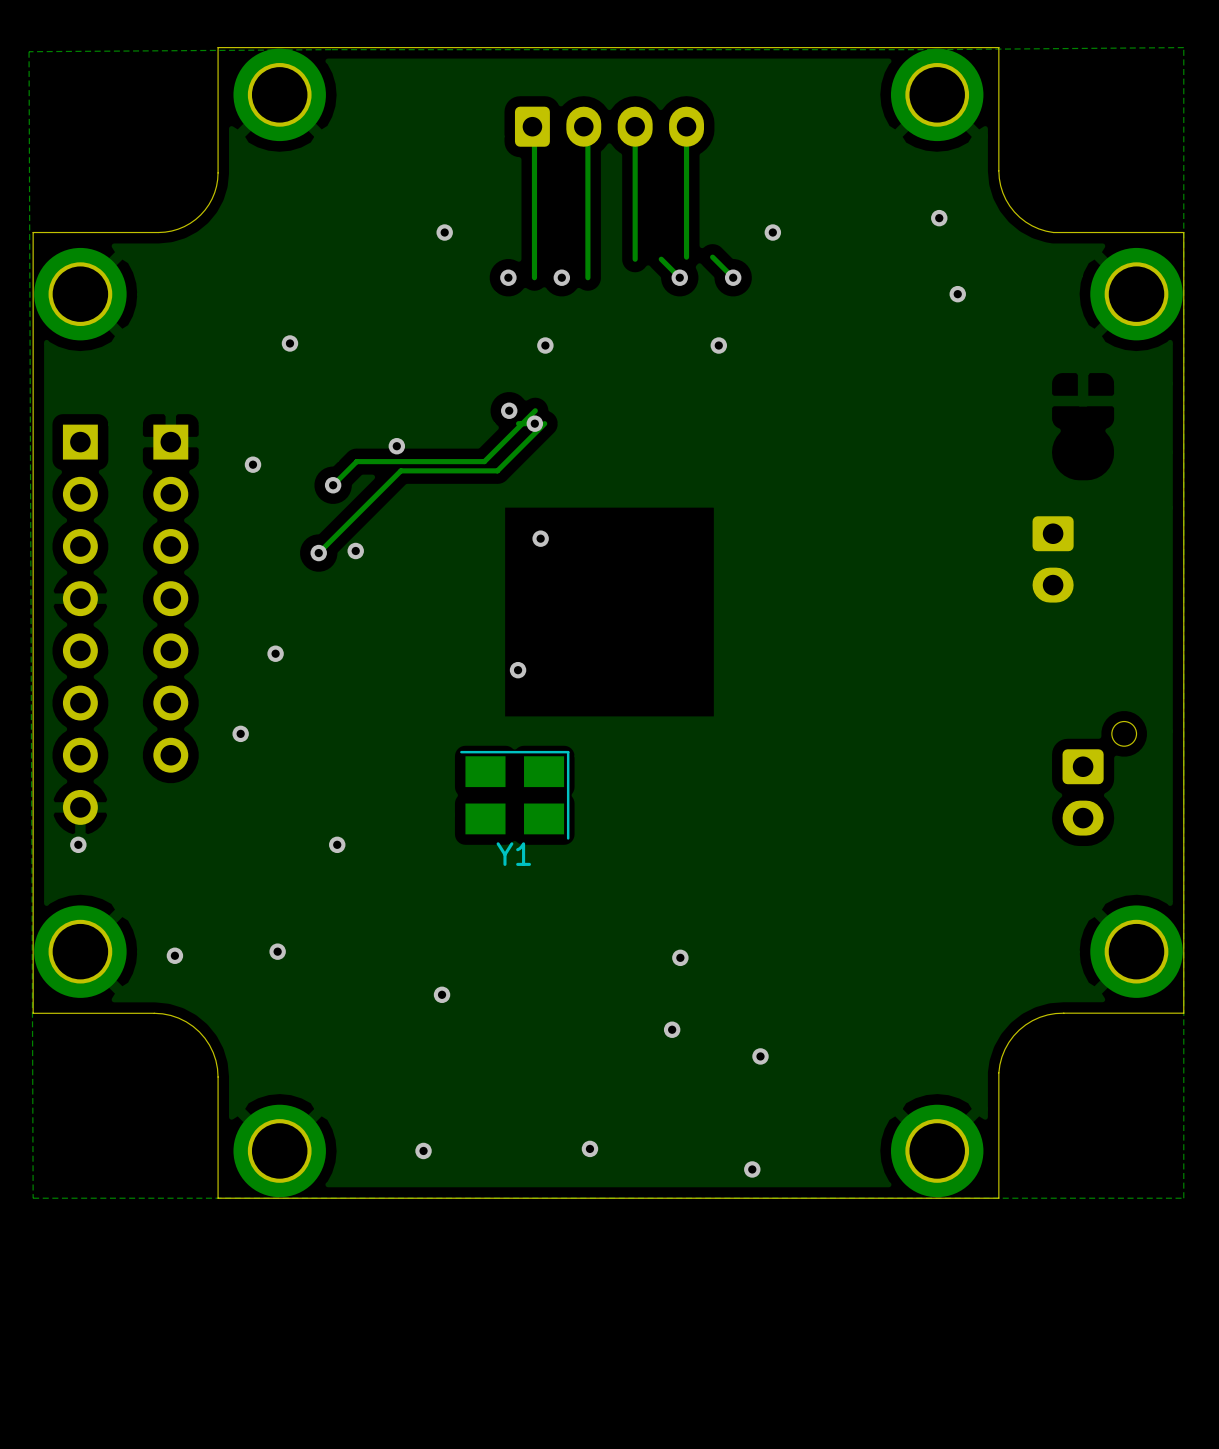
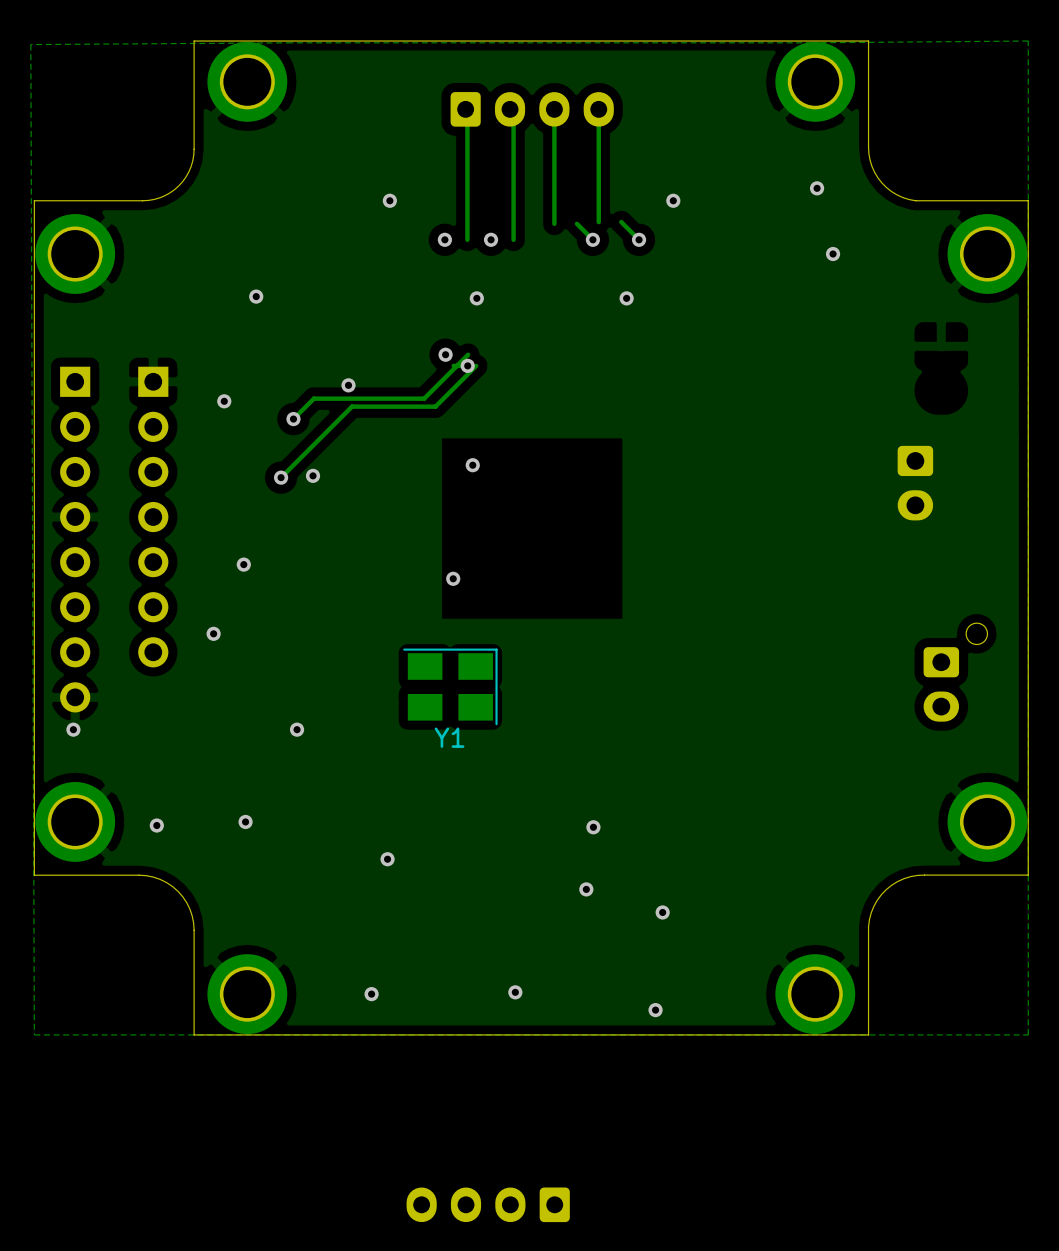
part: none -> (488, 1204)

